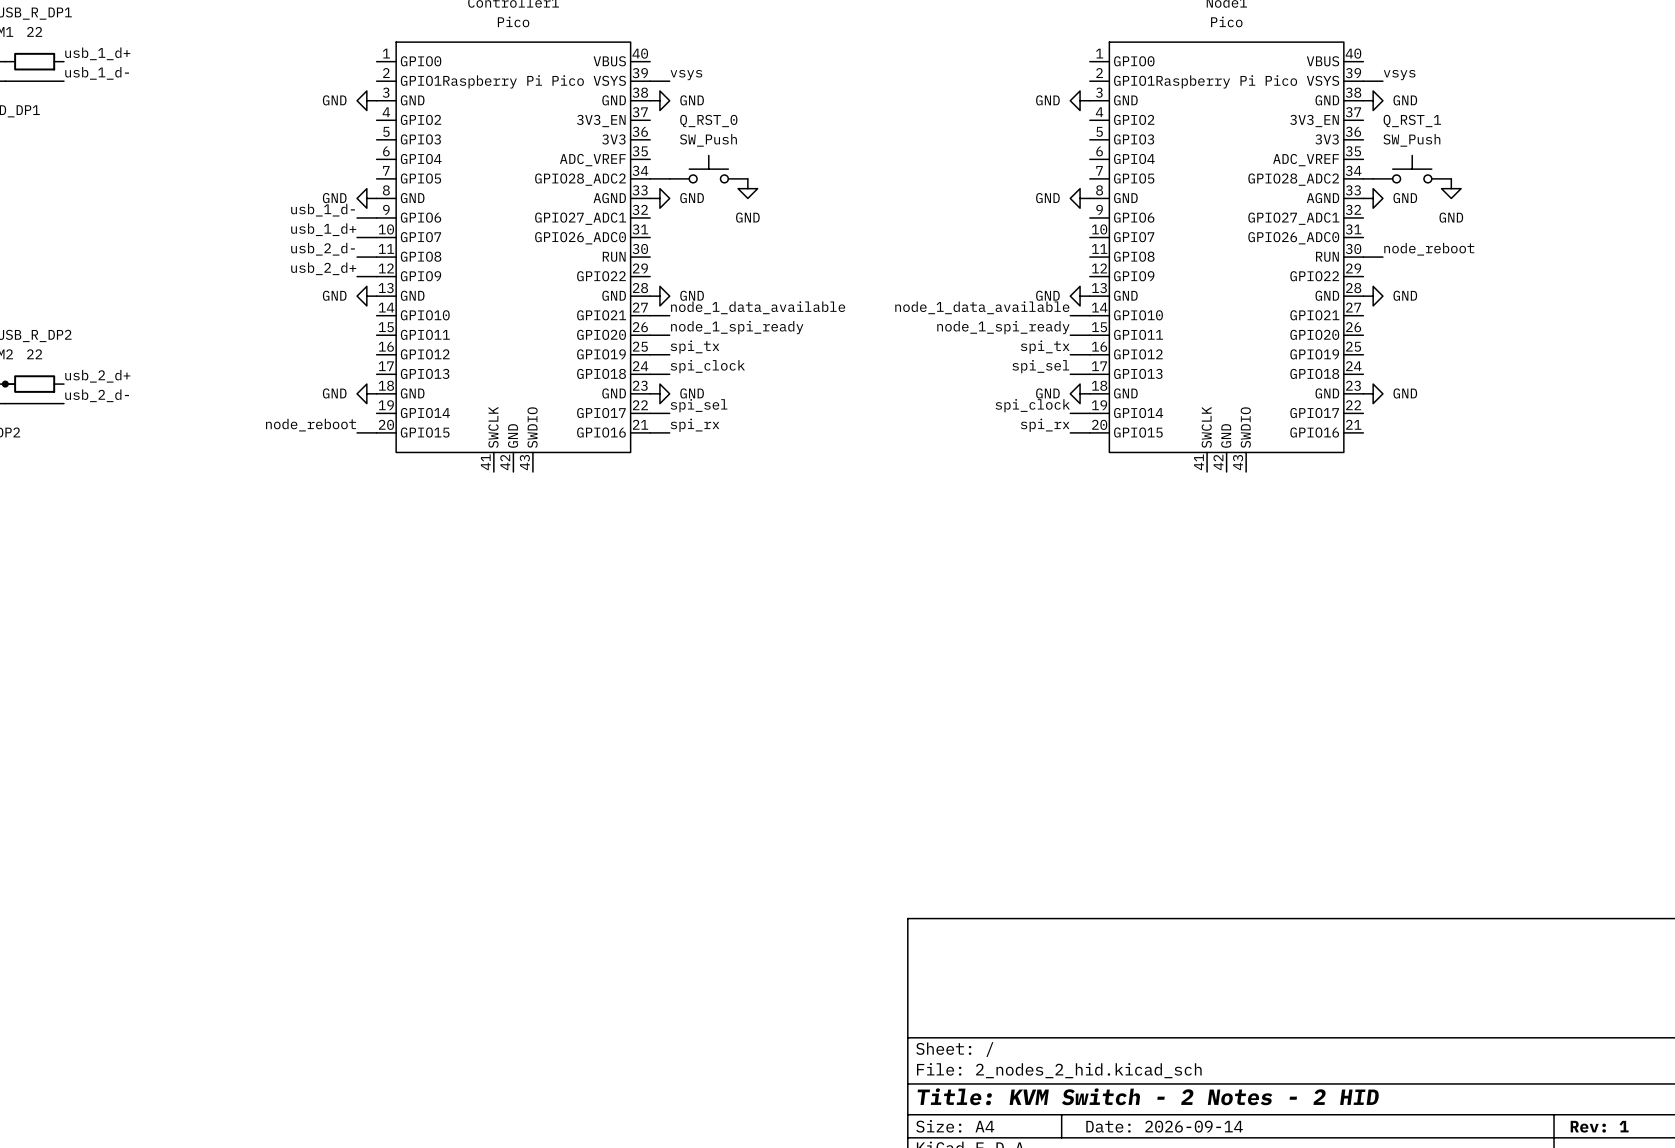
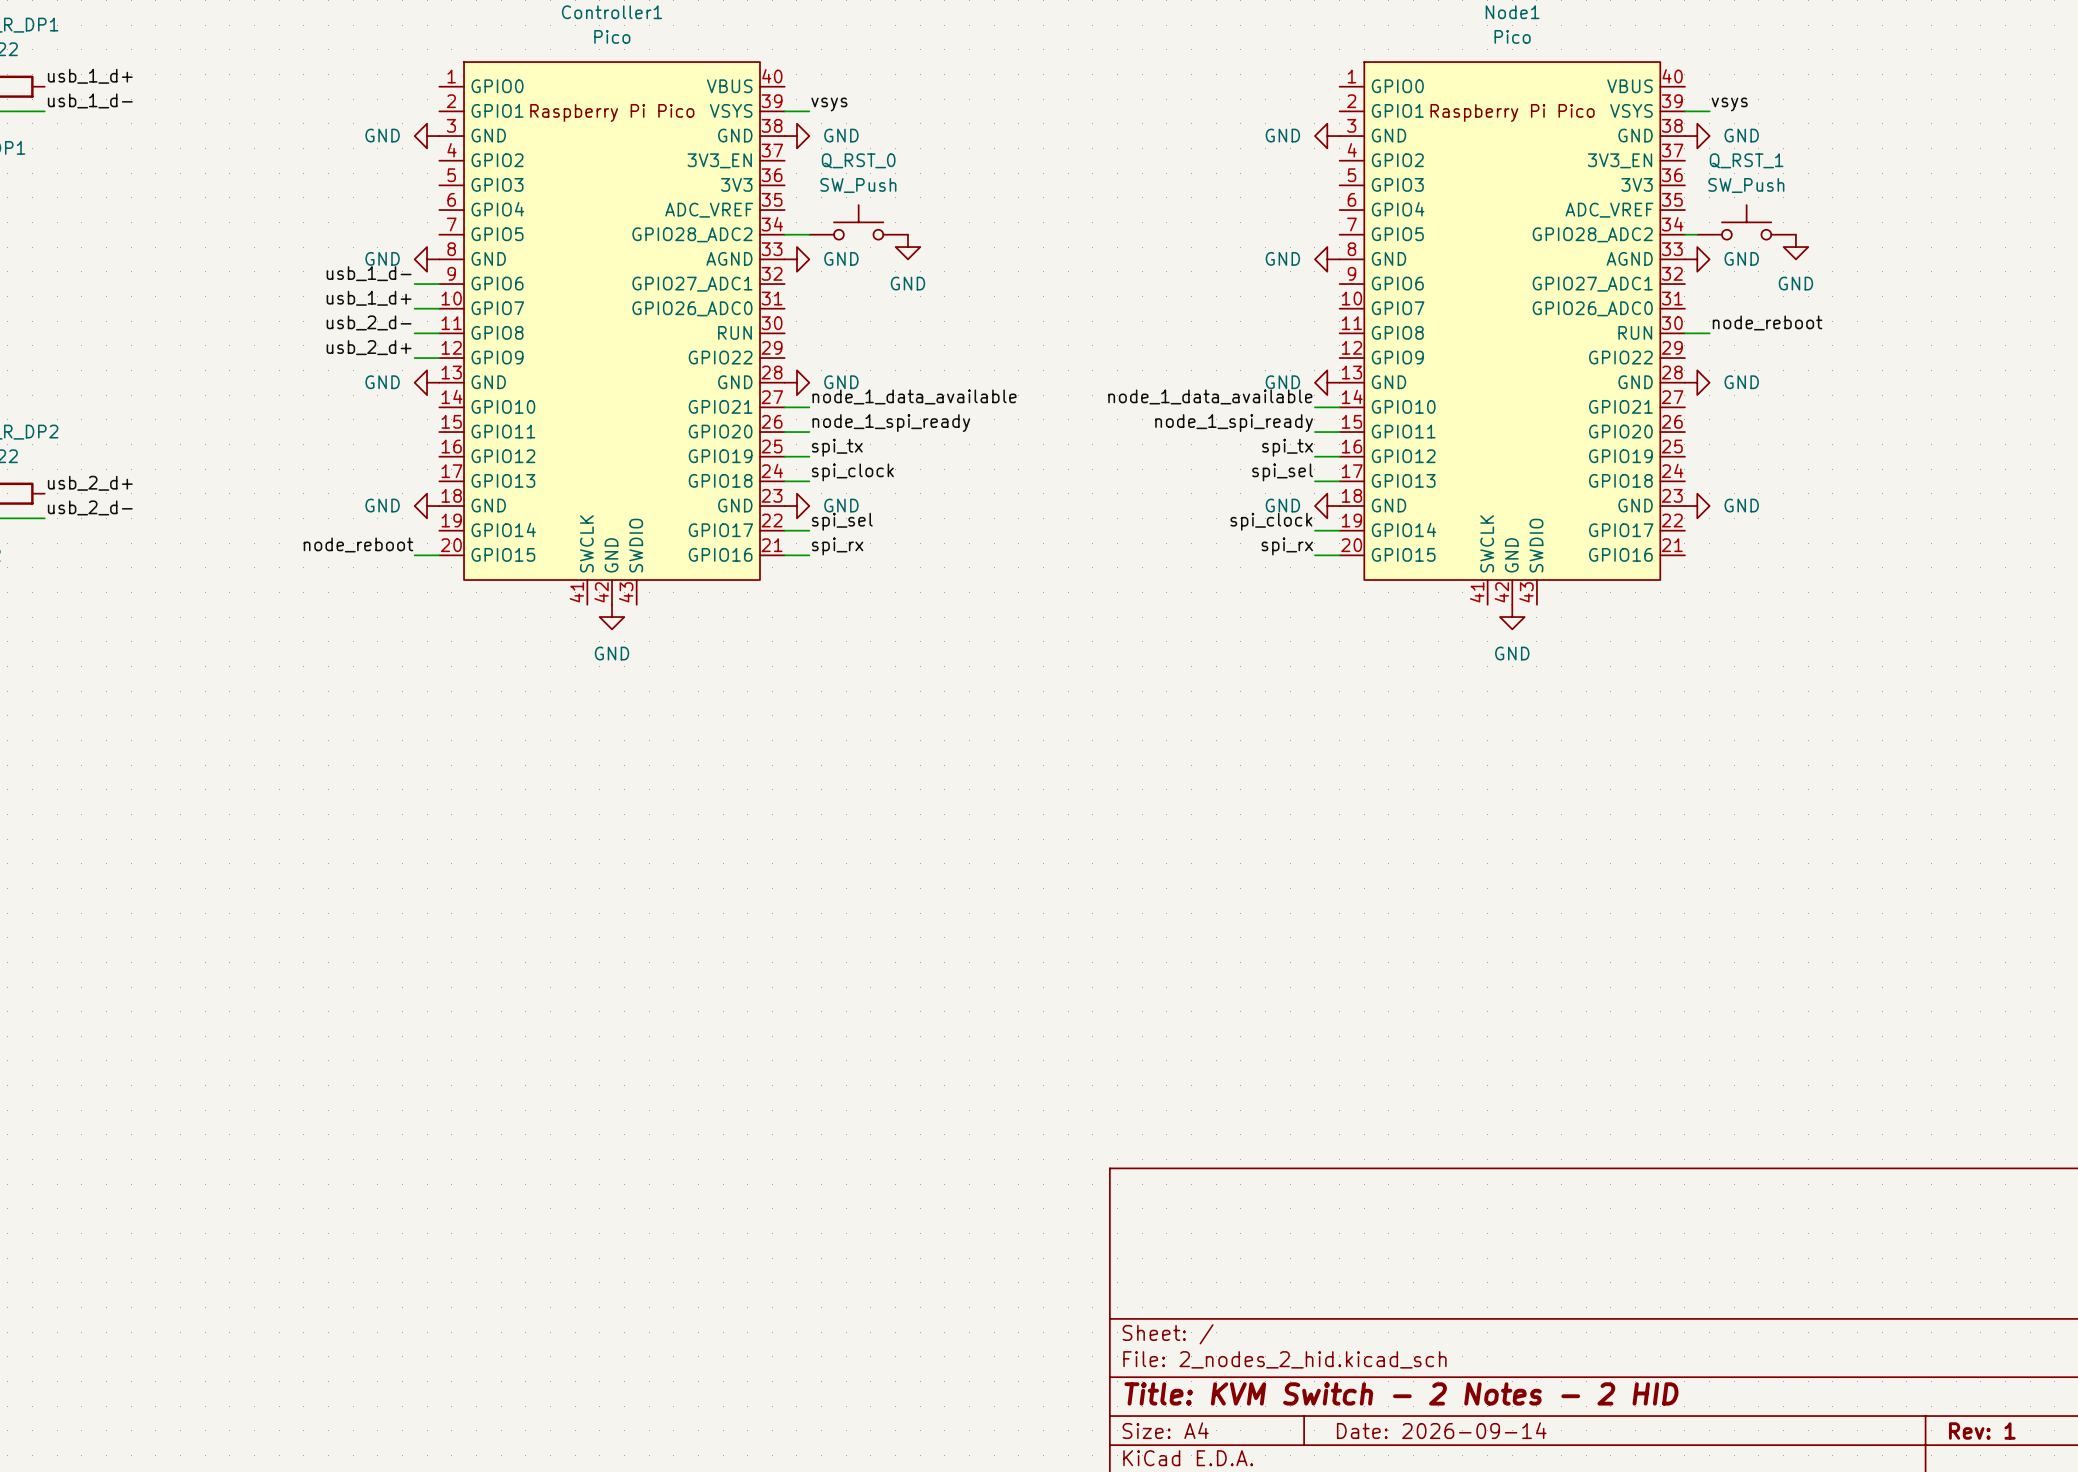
power symbol: none -> GND (612, 617)
power symbol: none -> GND (1512, 617)

